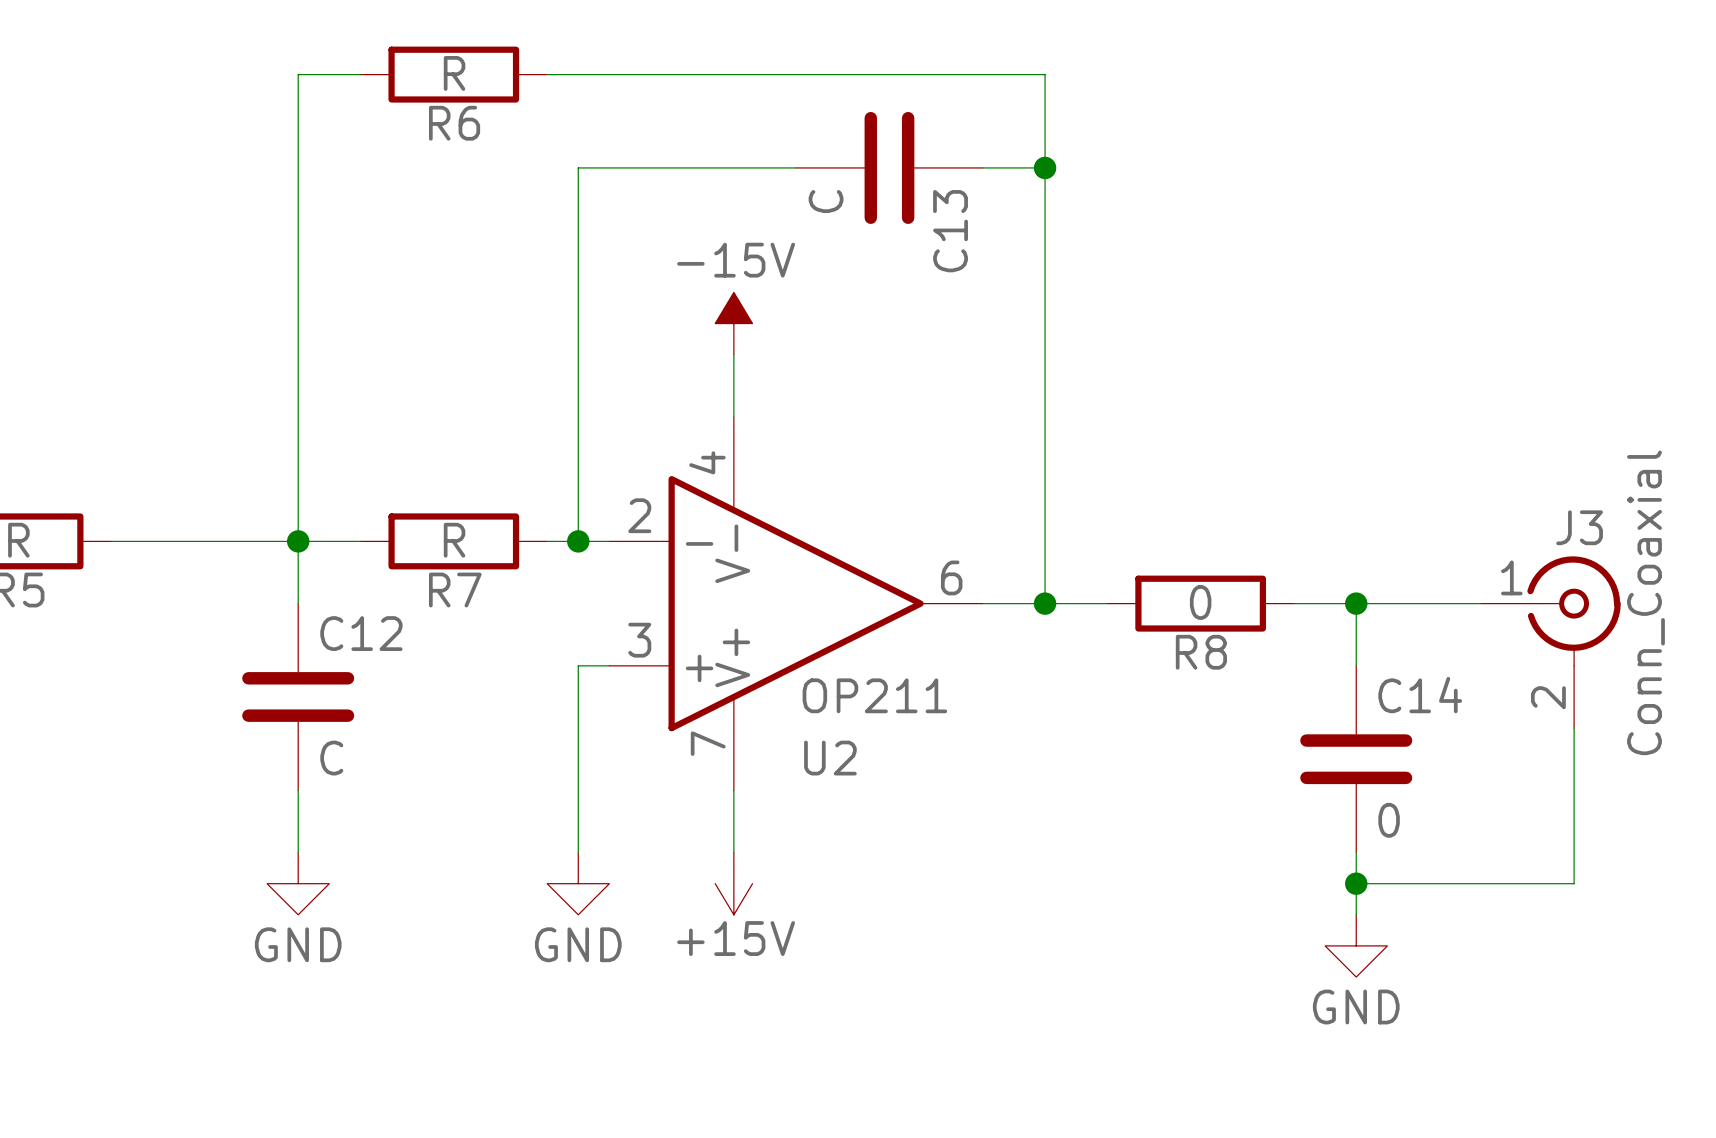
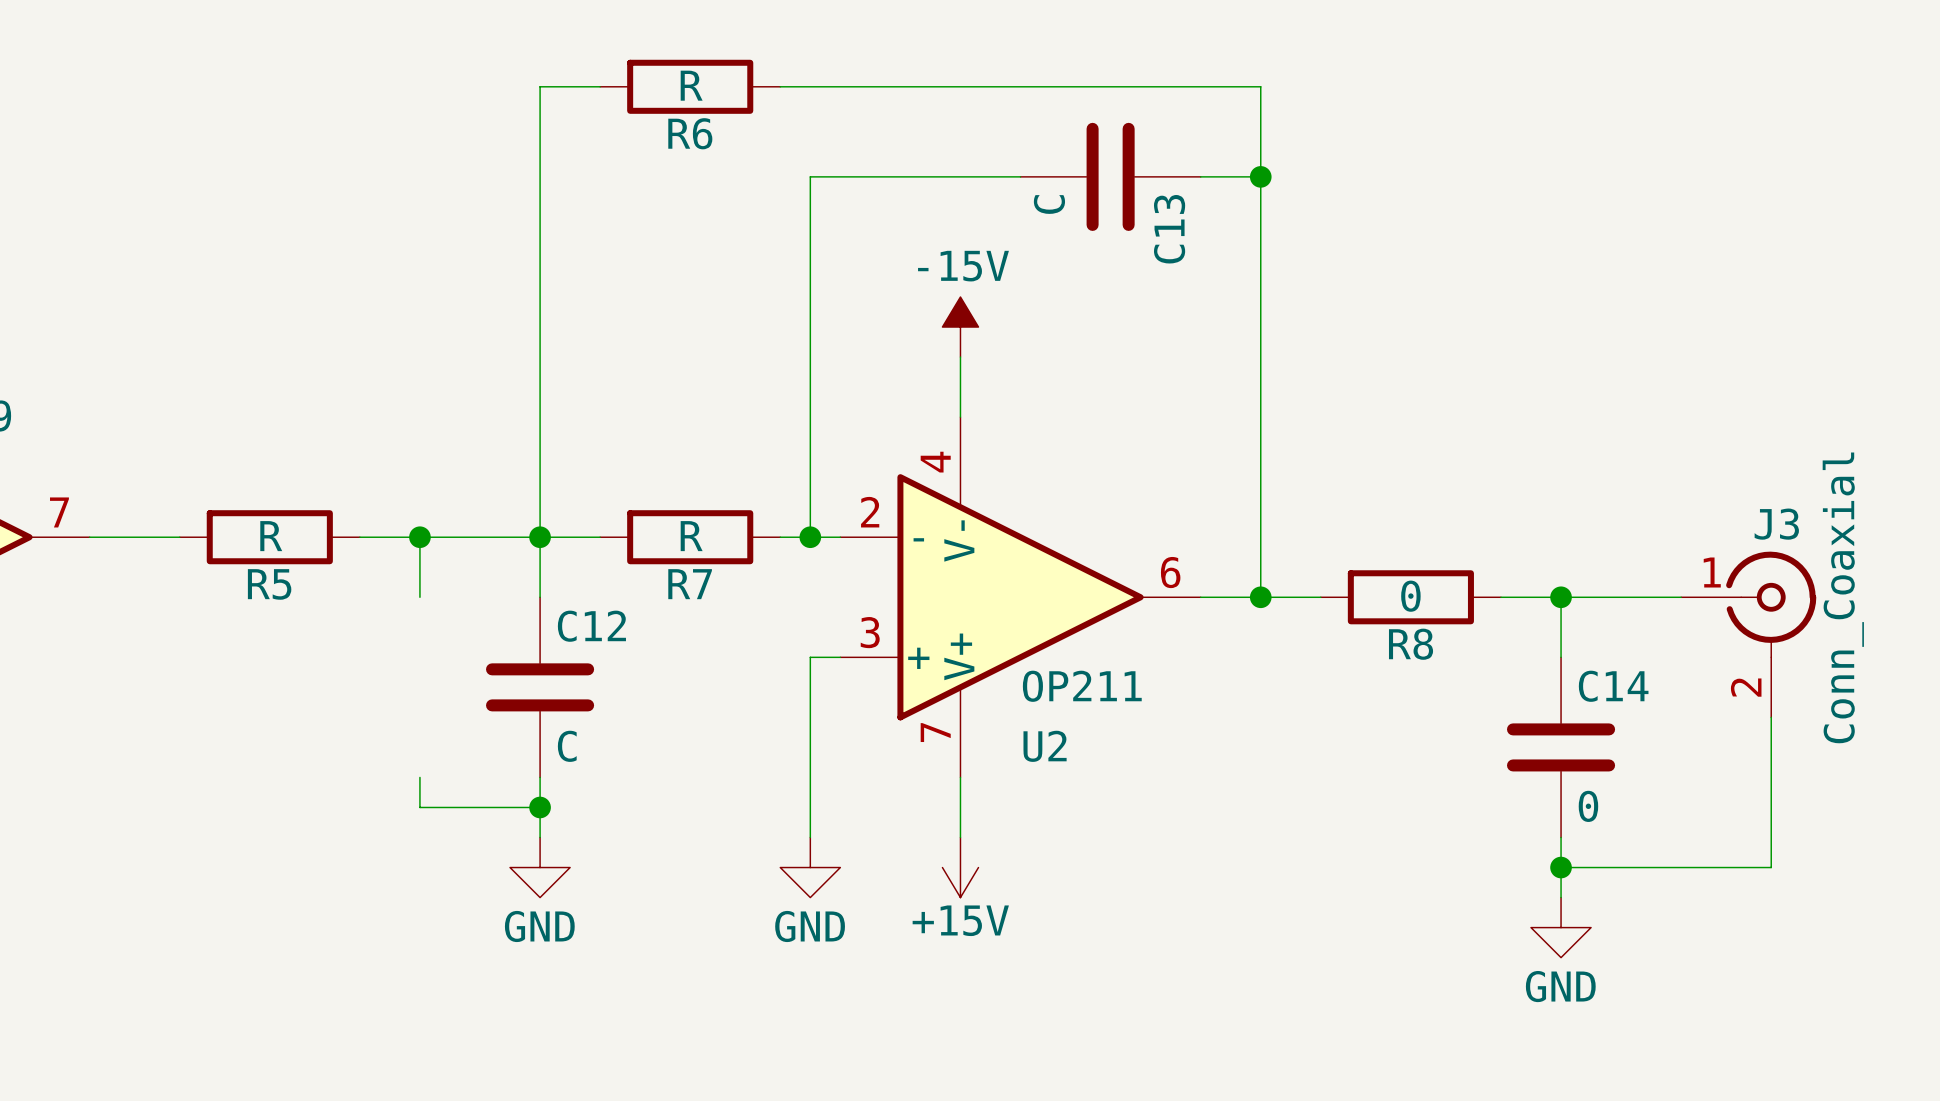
wire: none -> (419, 537) (419, 597)
junction: none -> (419, 537)
wire: none -> (419, 777) (419, 807) (540, 807)
junction: none -> (540, 807)

